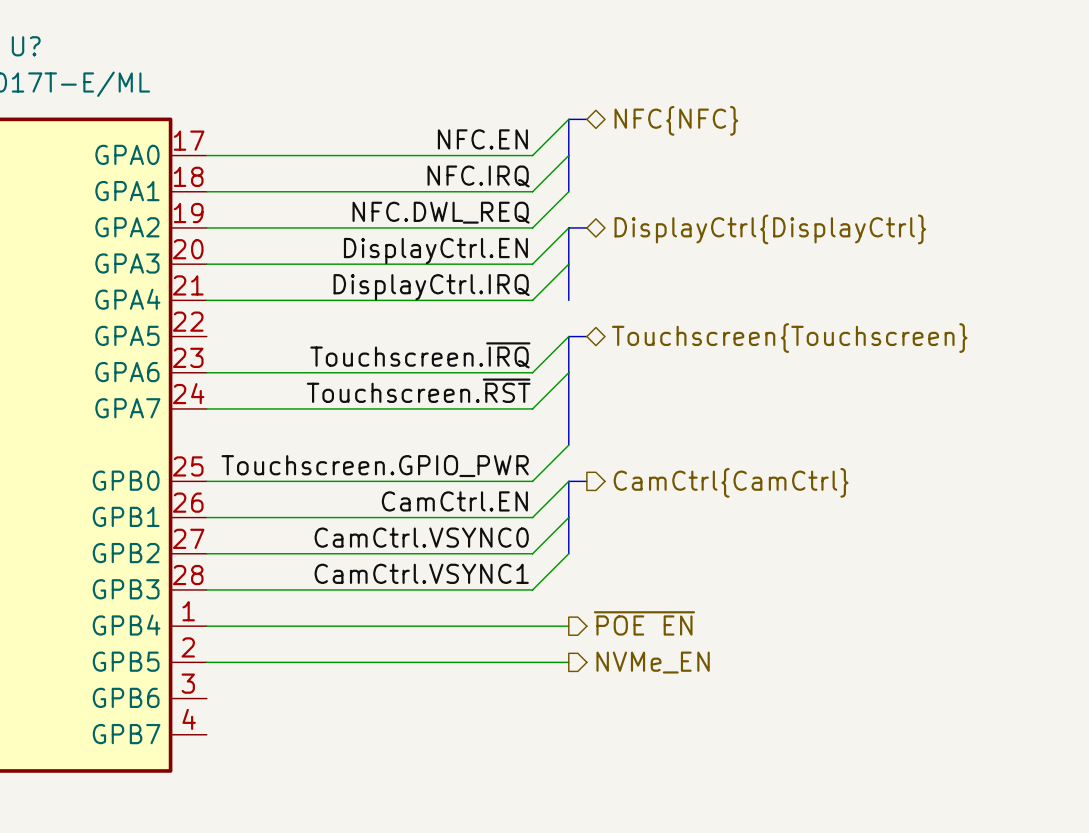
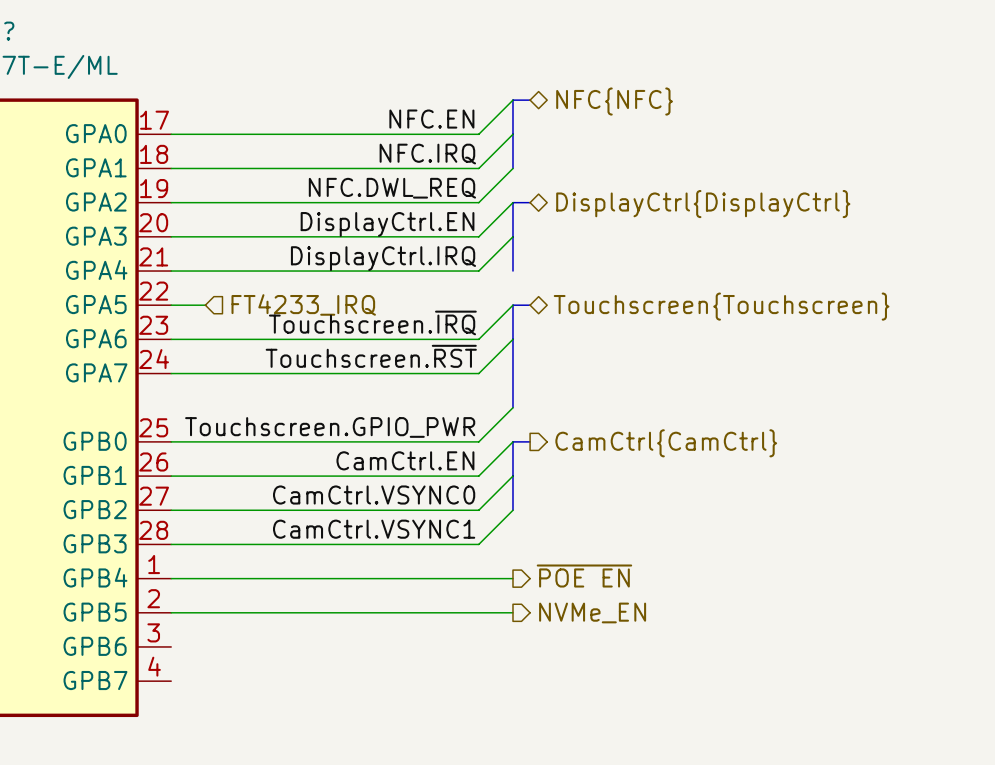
wire: none -> (171, 305) (205, 305)
hierarchical label: none -> FT4233_IRQ (303, 304)

